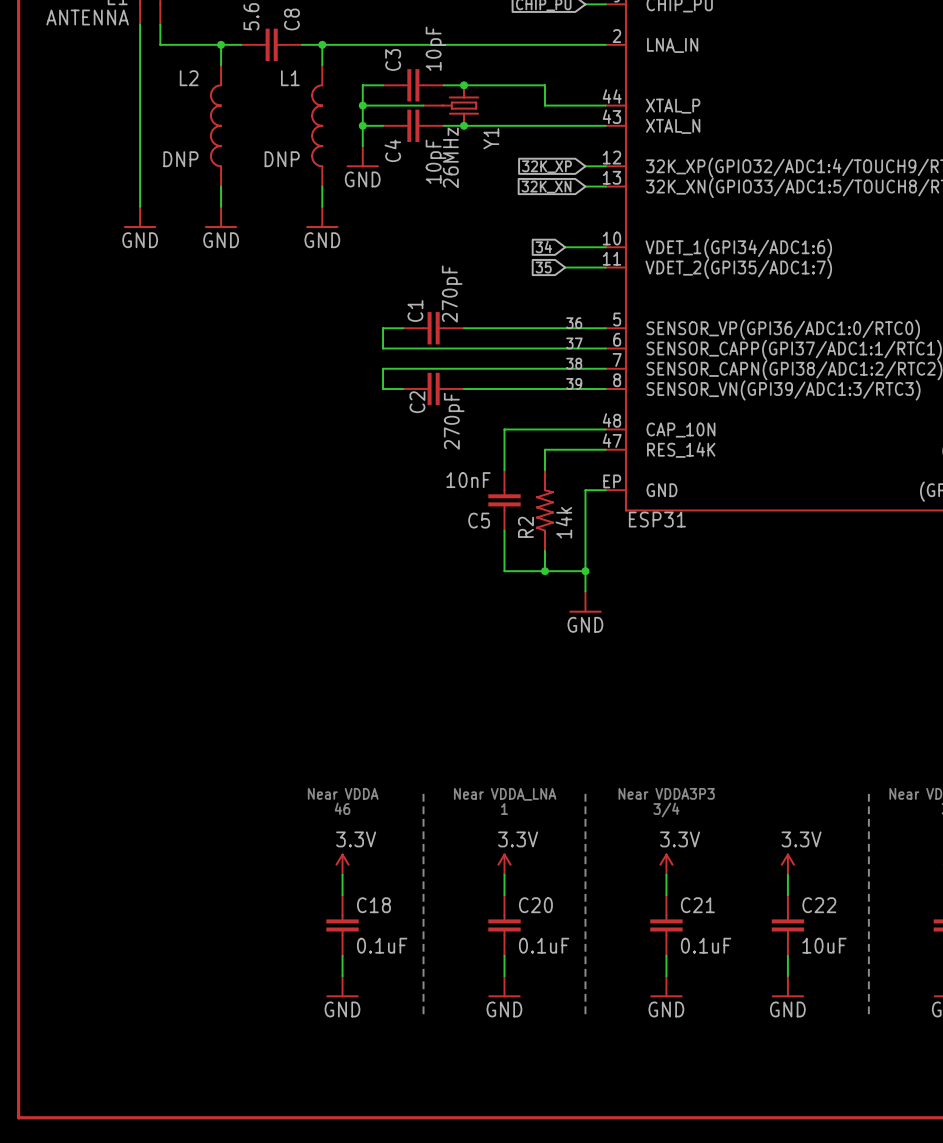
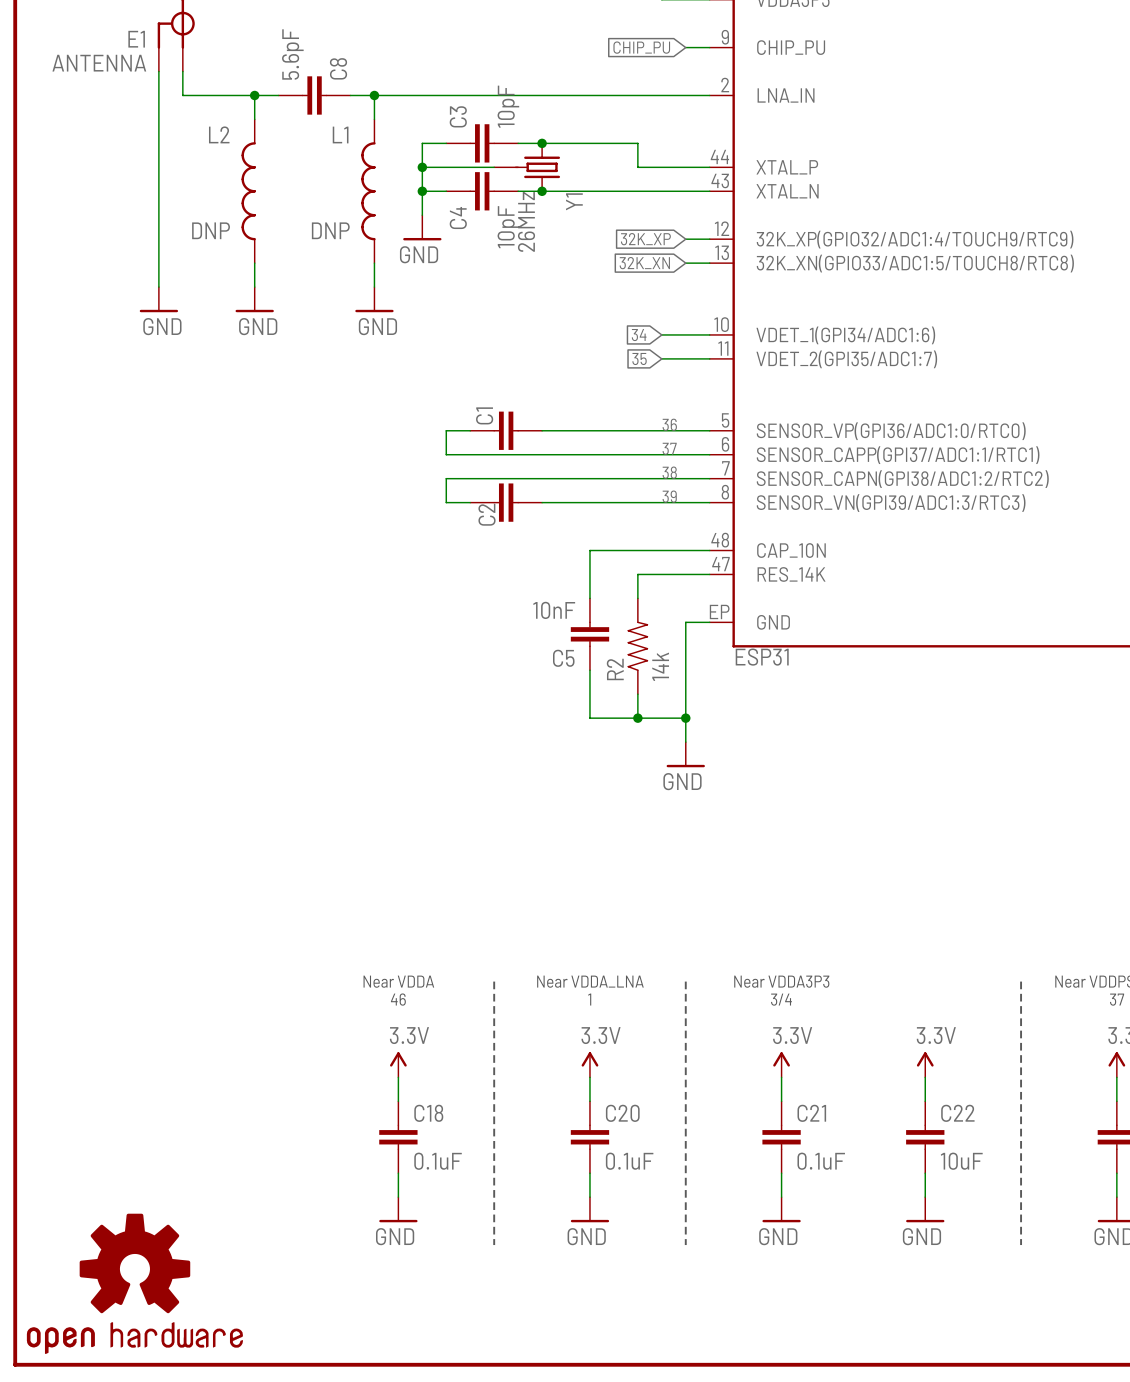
C1 value: 270pF (452, 294) -> none
C2 value: 270pF (454, 421) -> none
part: none -> (134, 1283)

